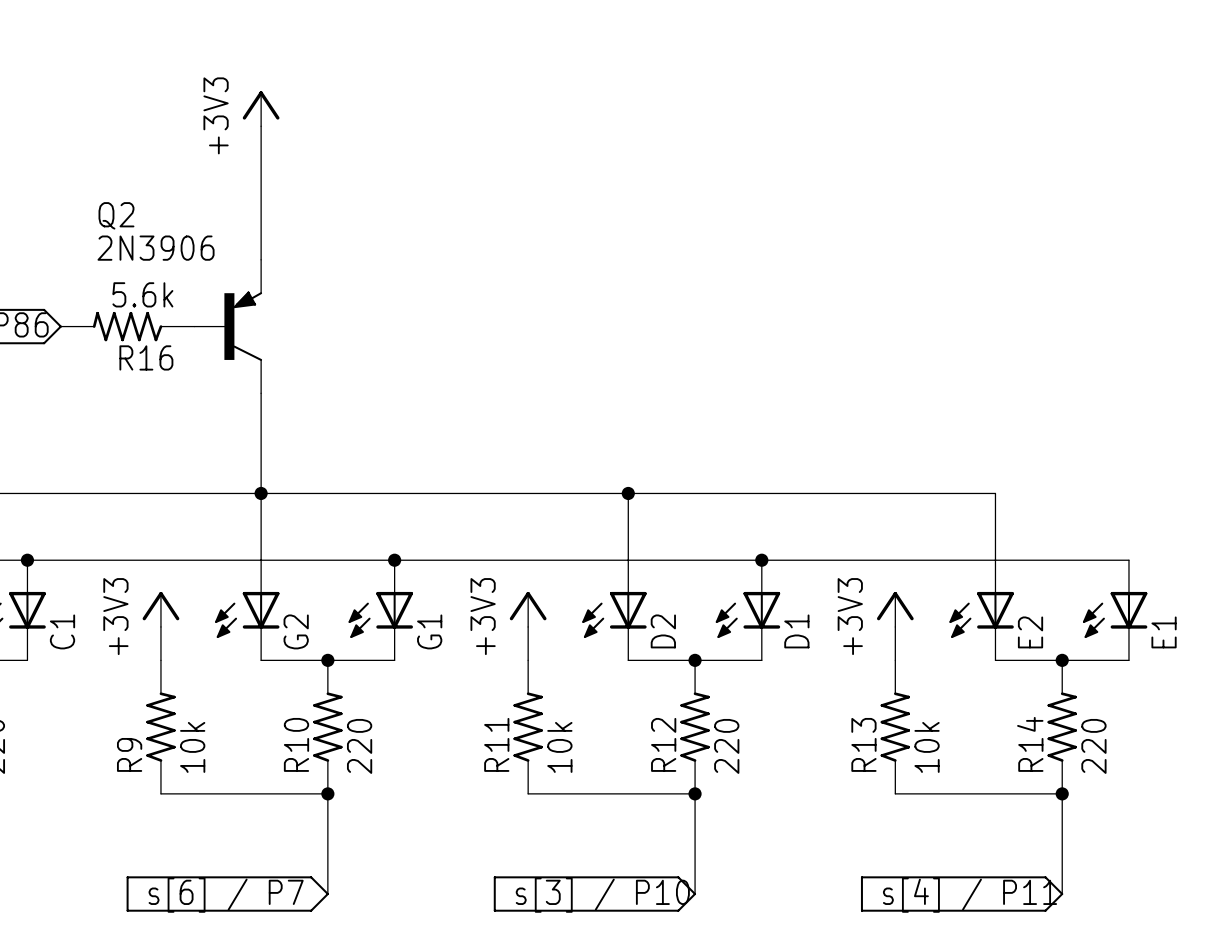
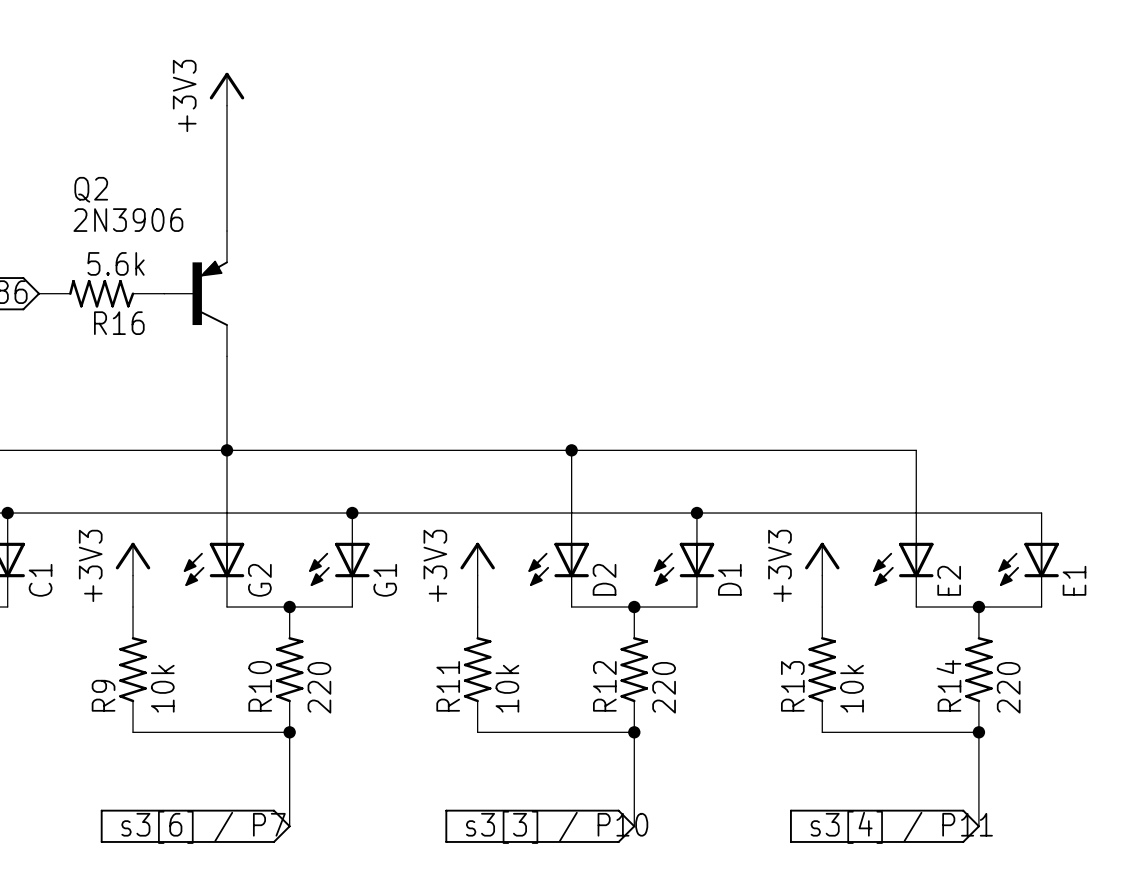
part value: s[6] / P7 (226, 895) -> s3[6] / P7 (203, 827)
part value: s[3] / P10 (602, 895) -> s3[3] / P10 (557, 827)
part value: s[4] / P11 (969, 895) -> s3[4] / P11 (901, 827)

